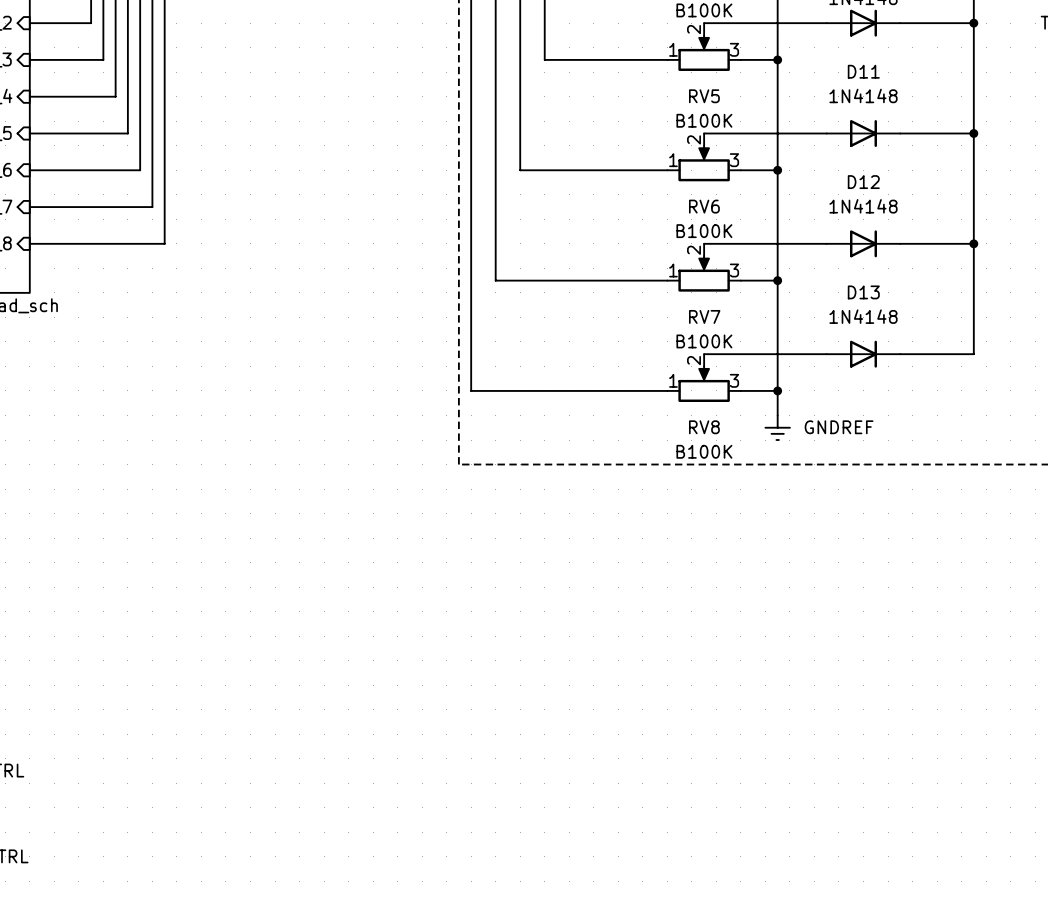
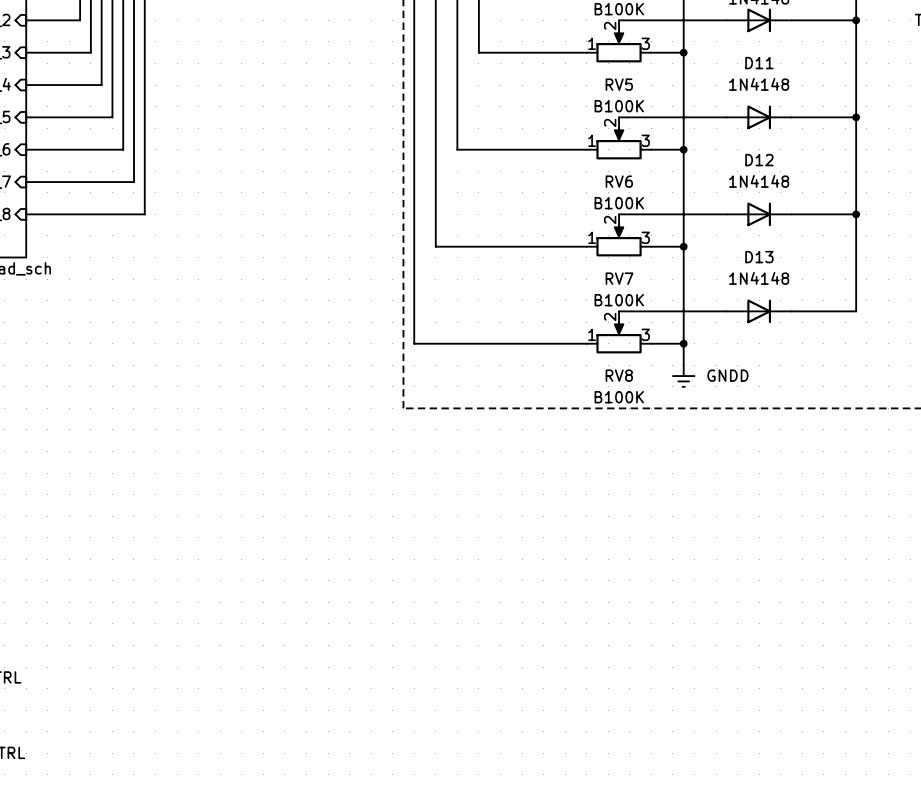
power symbol: GNDREF (777, 427) -> GNDD (683, 376)

